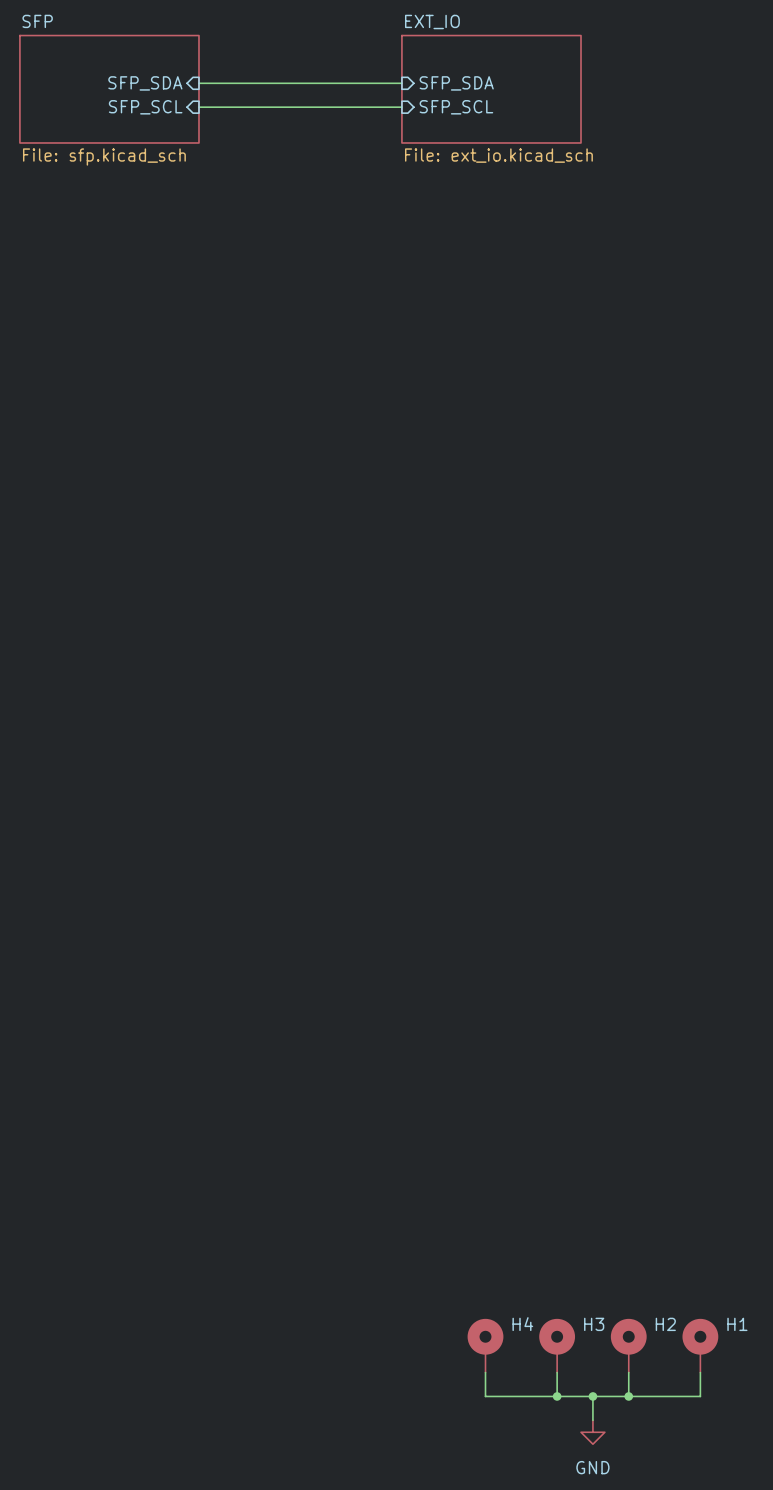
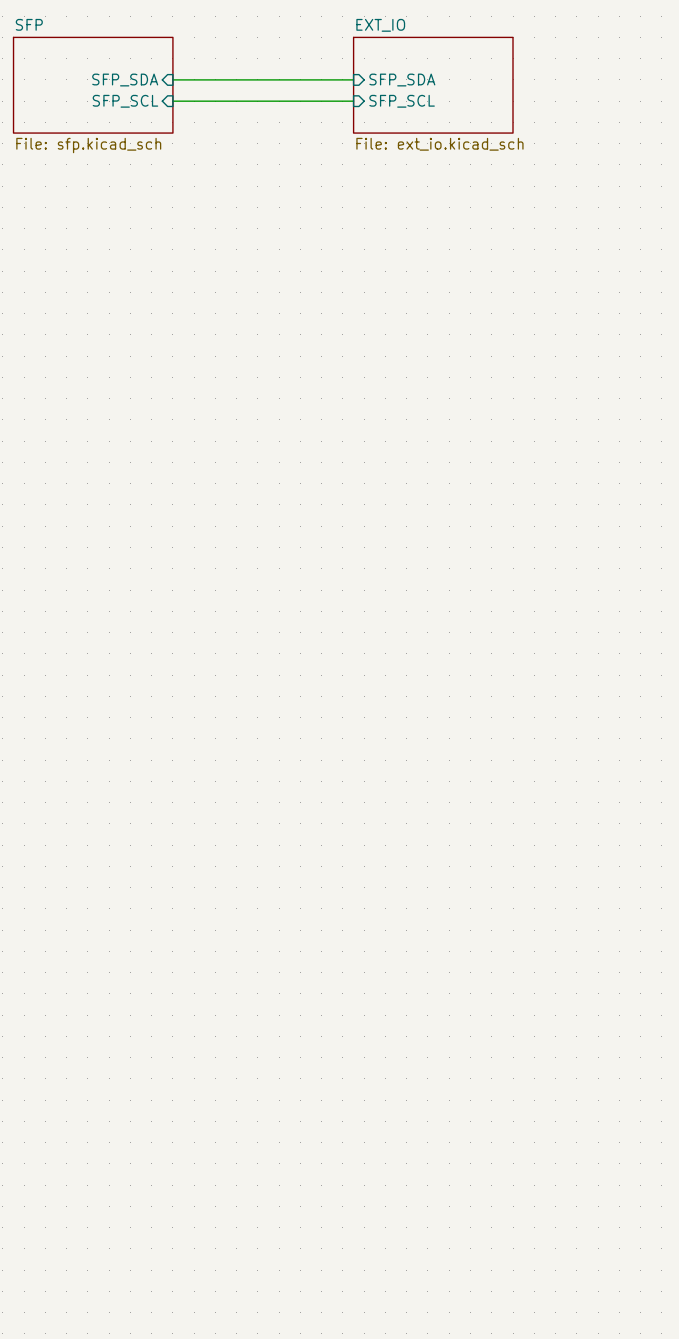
H4: (485, 1345) -> none
H3: (557, 1345) -> none
H2: (628, 1345) -> none
H1: (700, 1345) -> none
wire: (485, 1372) (485, 1396) (700, 1396) (700, 1372) -> none
wire: (557, 1372) (557, 1396) -> none
wire: (628, 1372) (628, 1396) -> none
junction: (557, 1396) -> none
wire: (592, 1396) (592, 1420) -> none
junction: (592, 1396) -> none
junction: (628, 1396) -> none
power symbol: GND (592, 1432) -> none

